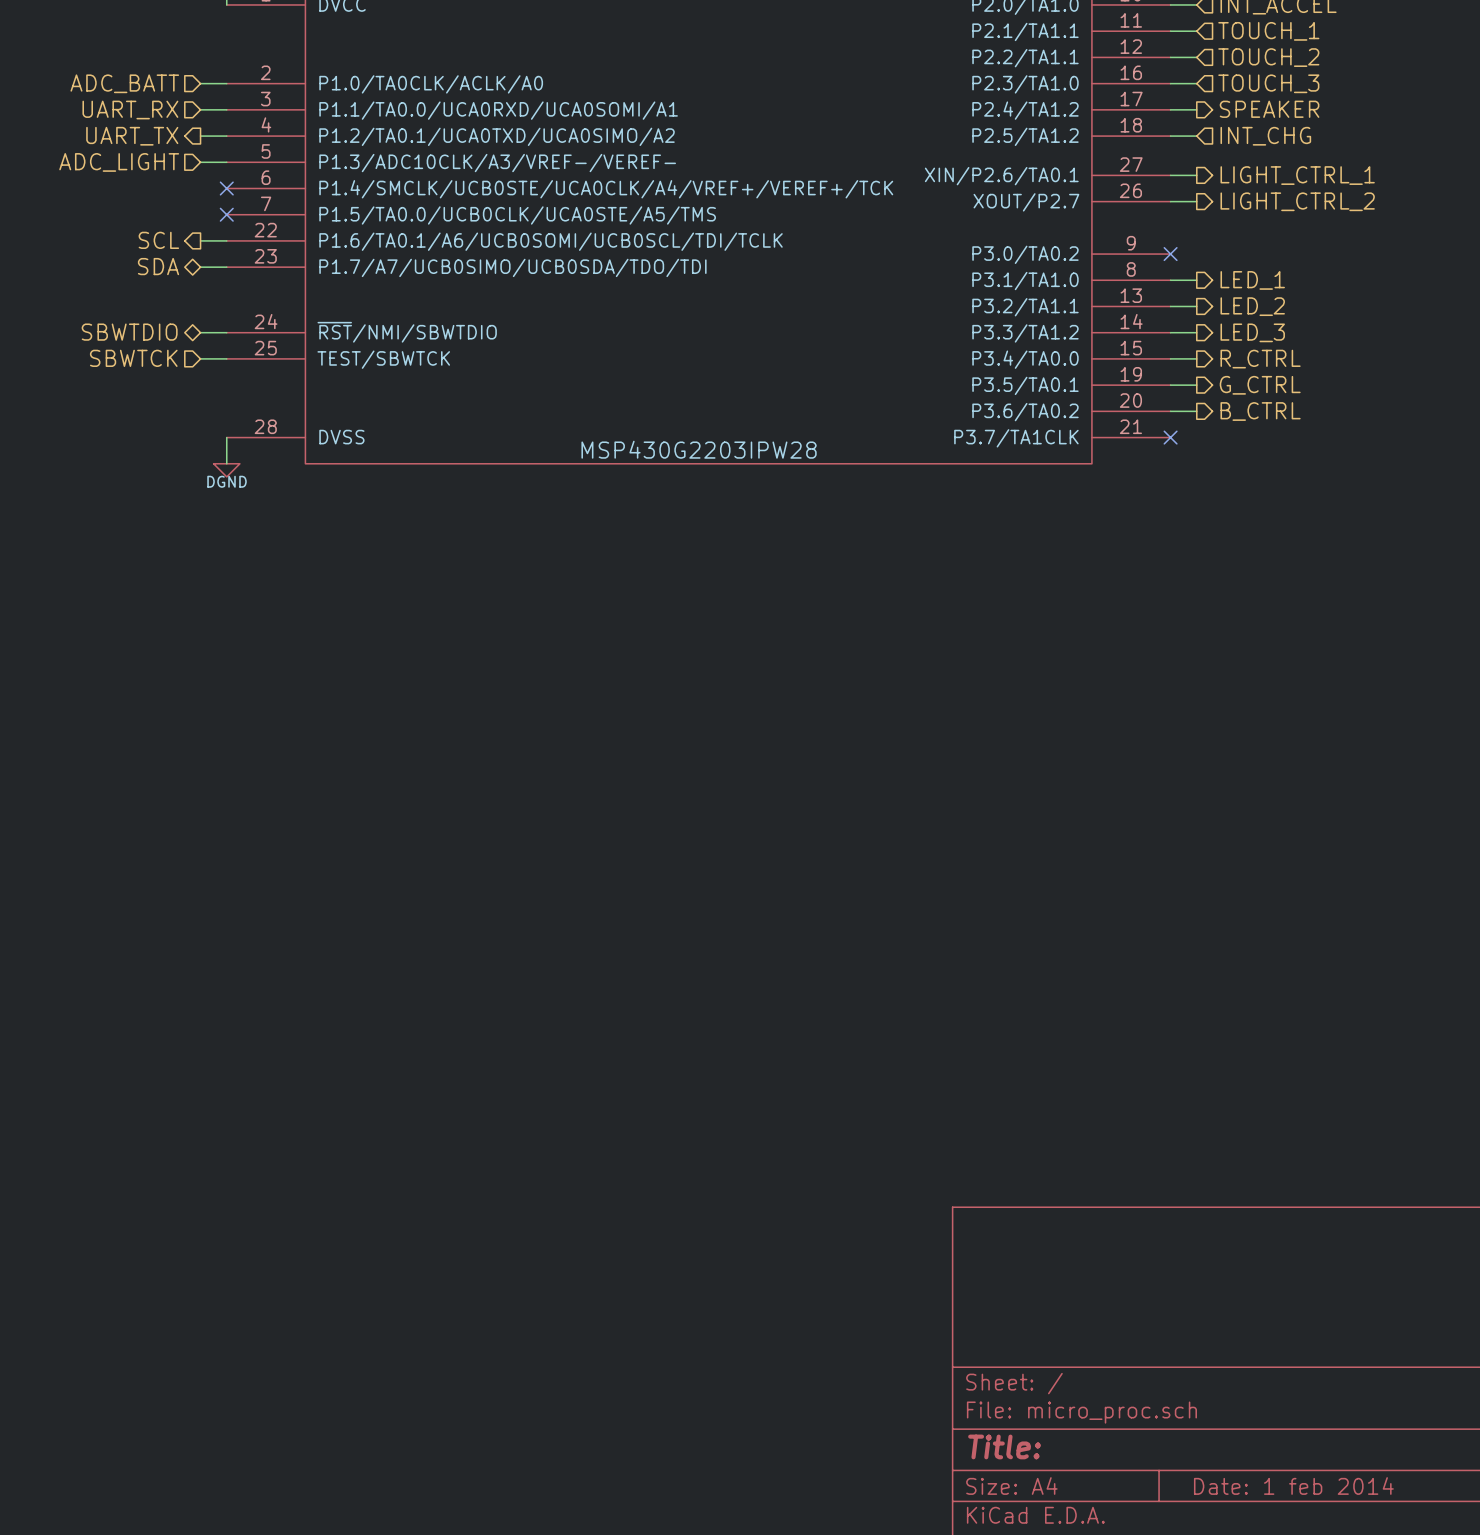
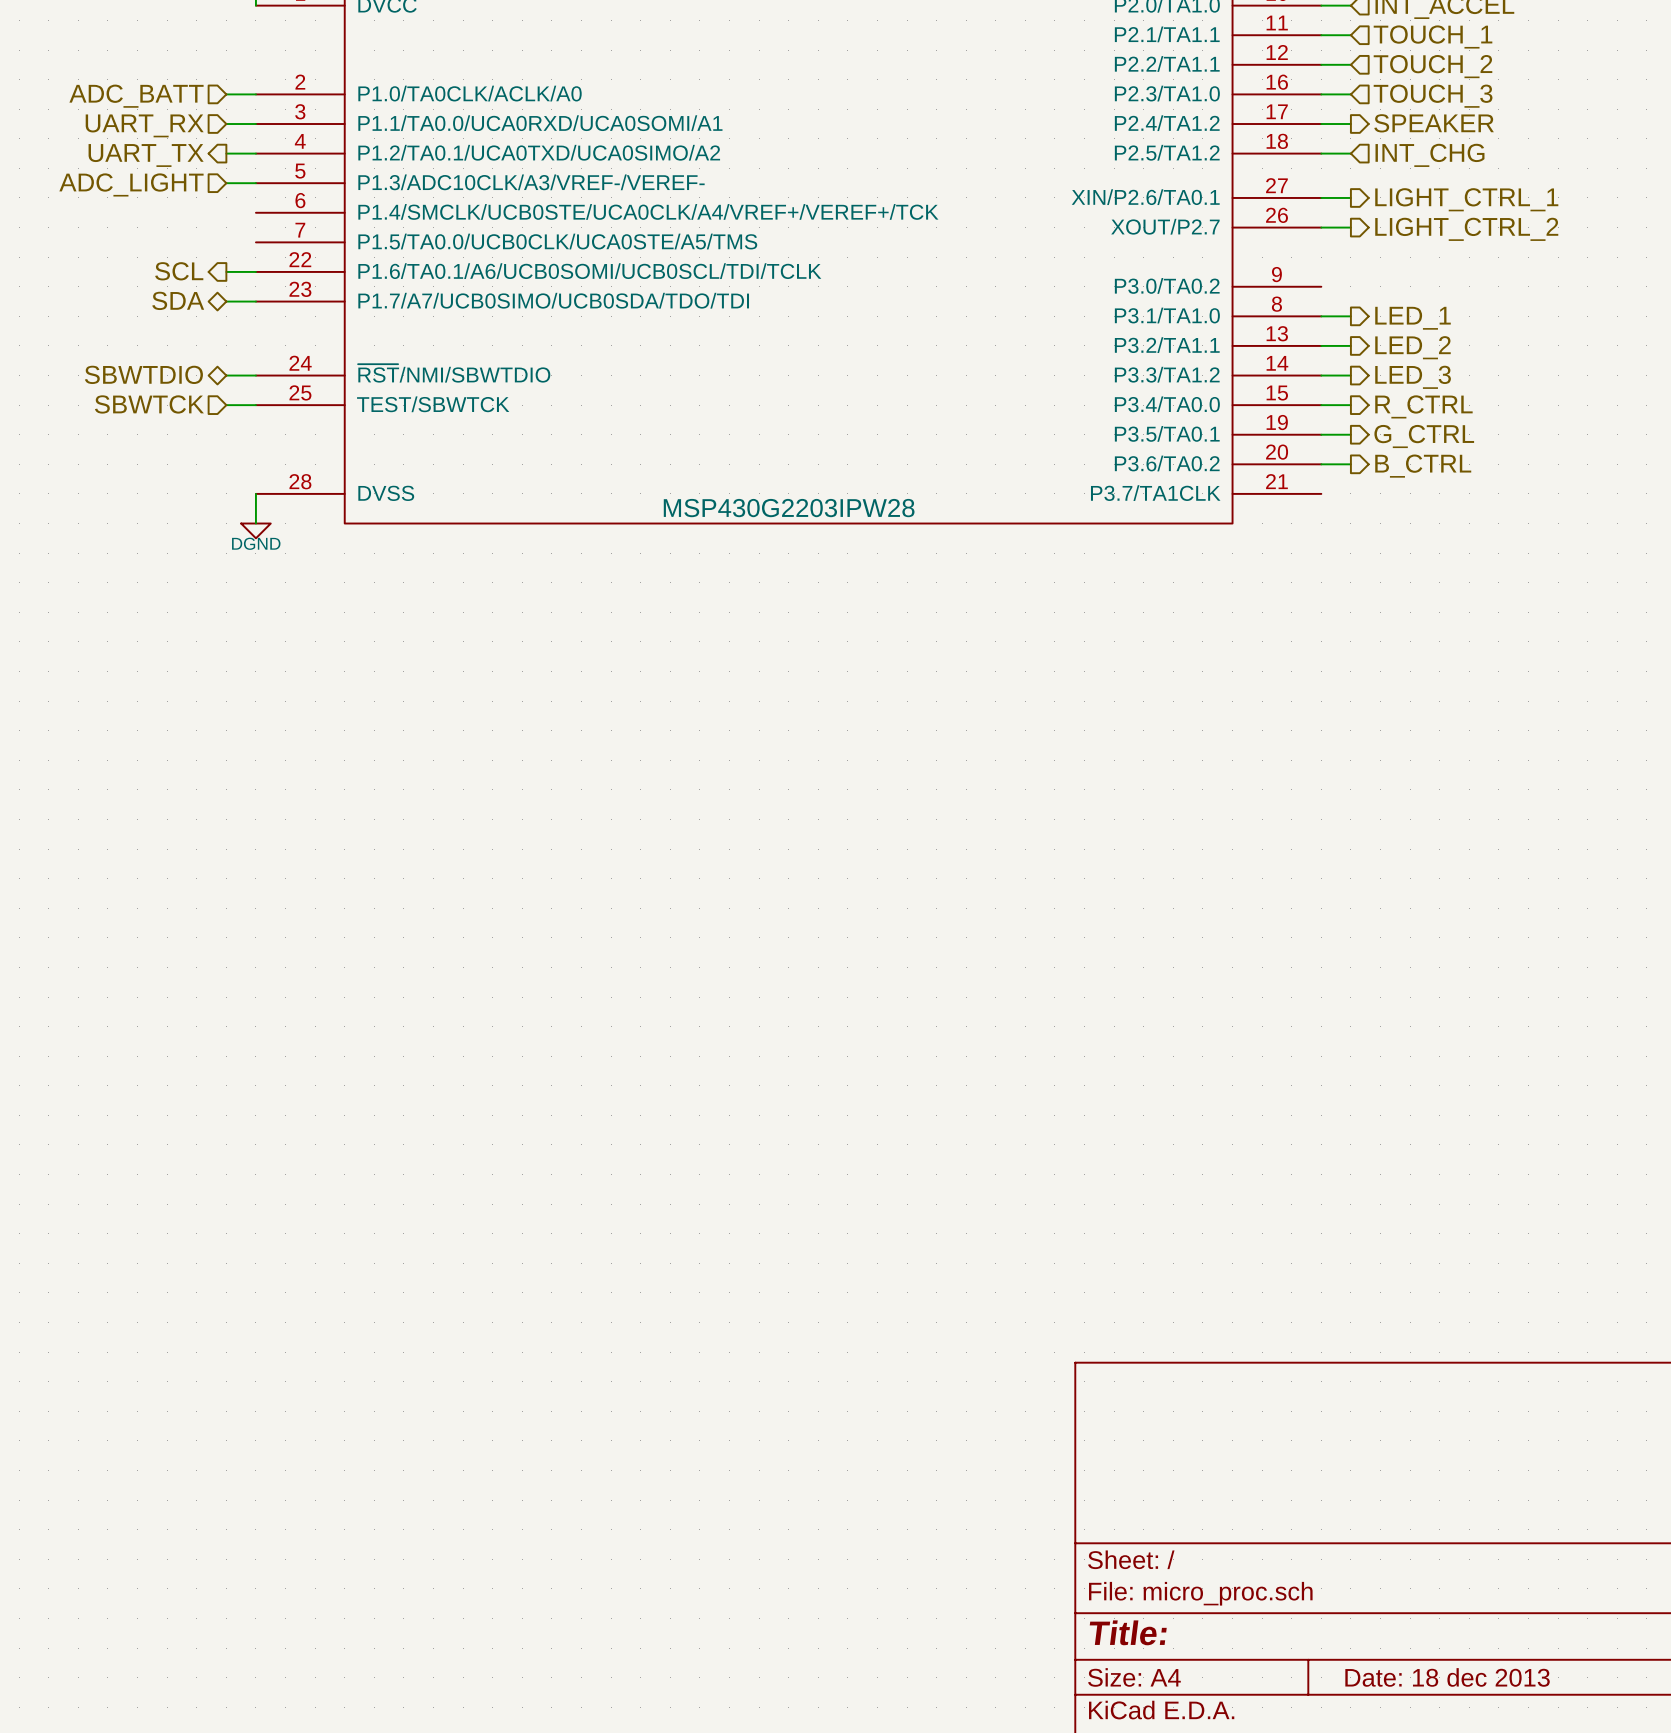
no-connect mark: (226, 188) -> none
no-connect mark: (226, 214) -> none
no-connect mark: (1170, 254) -> none
no-connect mark: (1170, 437) -> none
title block: Date: 1 feb 2014 (1293, 1486) -> Date: 18 dec 2013 (1447, 1677)

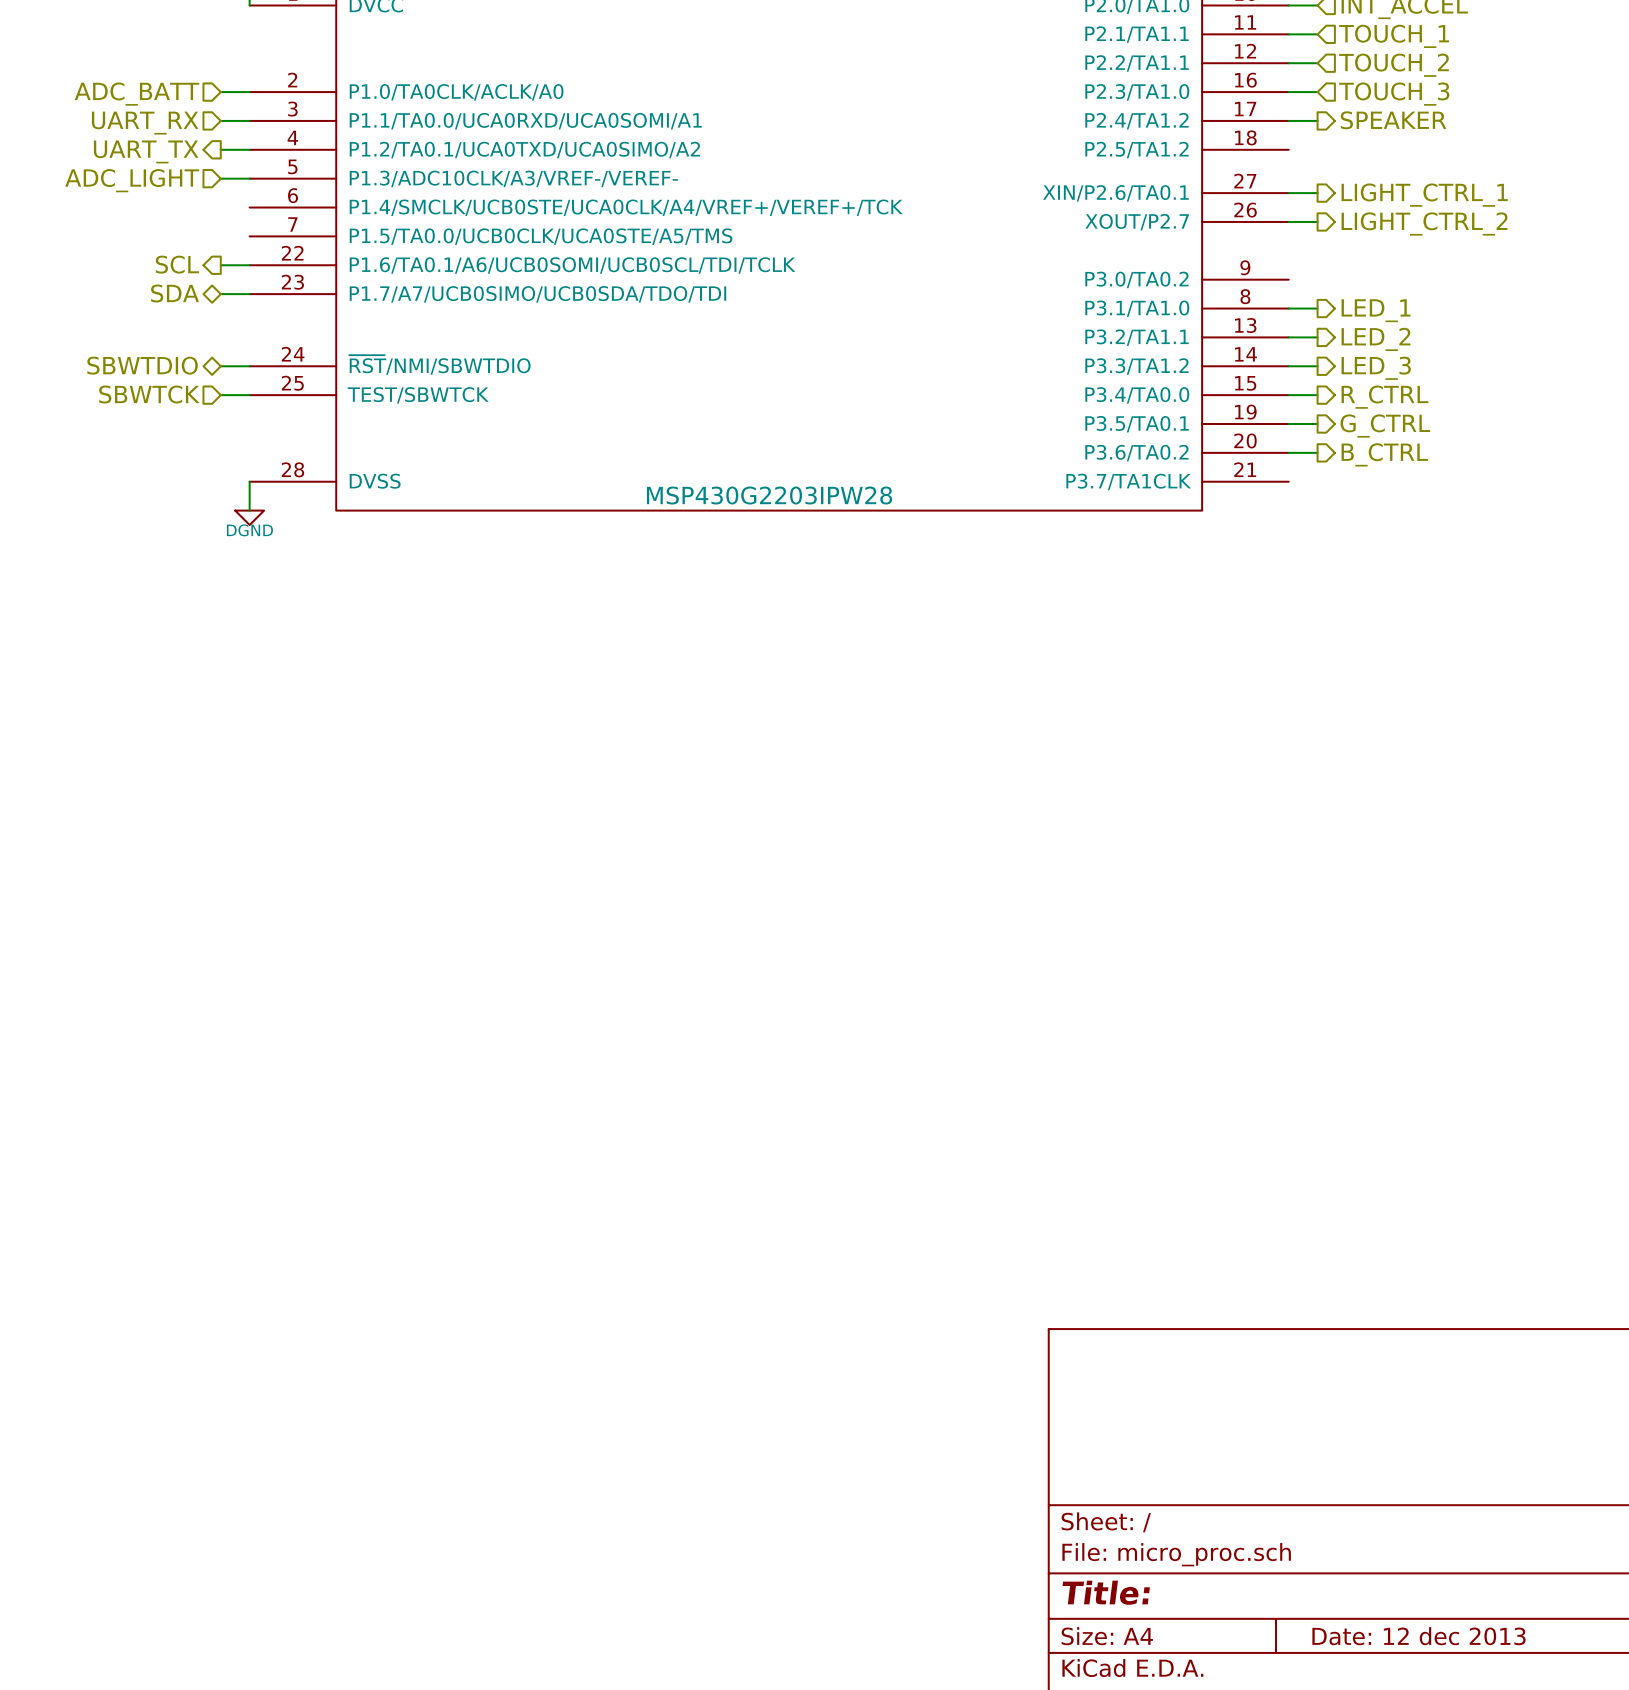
wire: (1321, 153) (1350, 153) -> none
hierarchical label: INT_CHG (1429, 155) -> none
title block: Date: 18 dec 2013 (1447, 1677) -> Date: 12 dec 2013 (1419, 1636)

